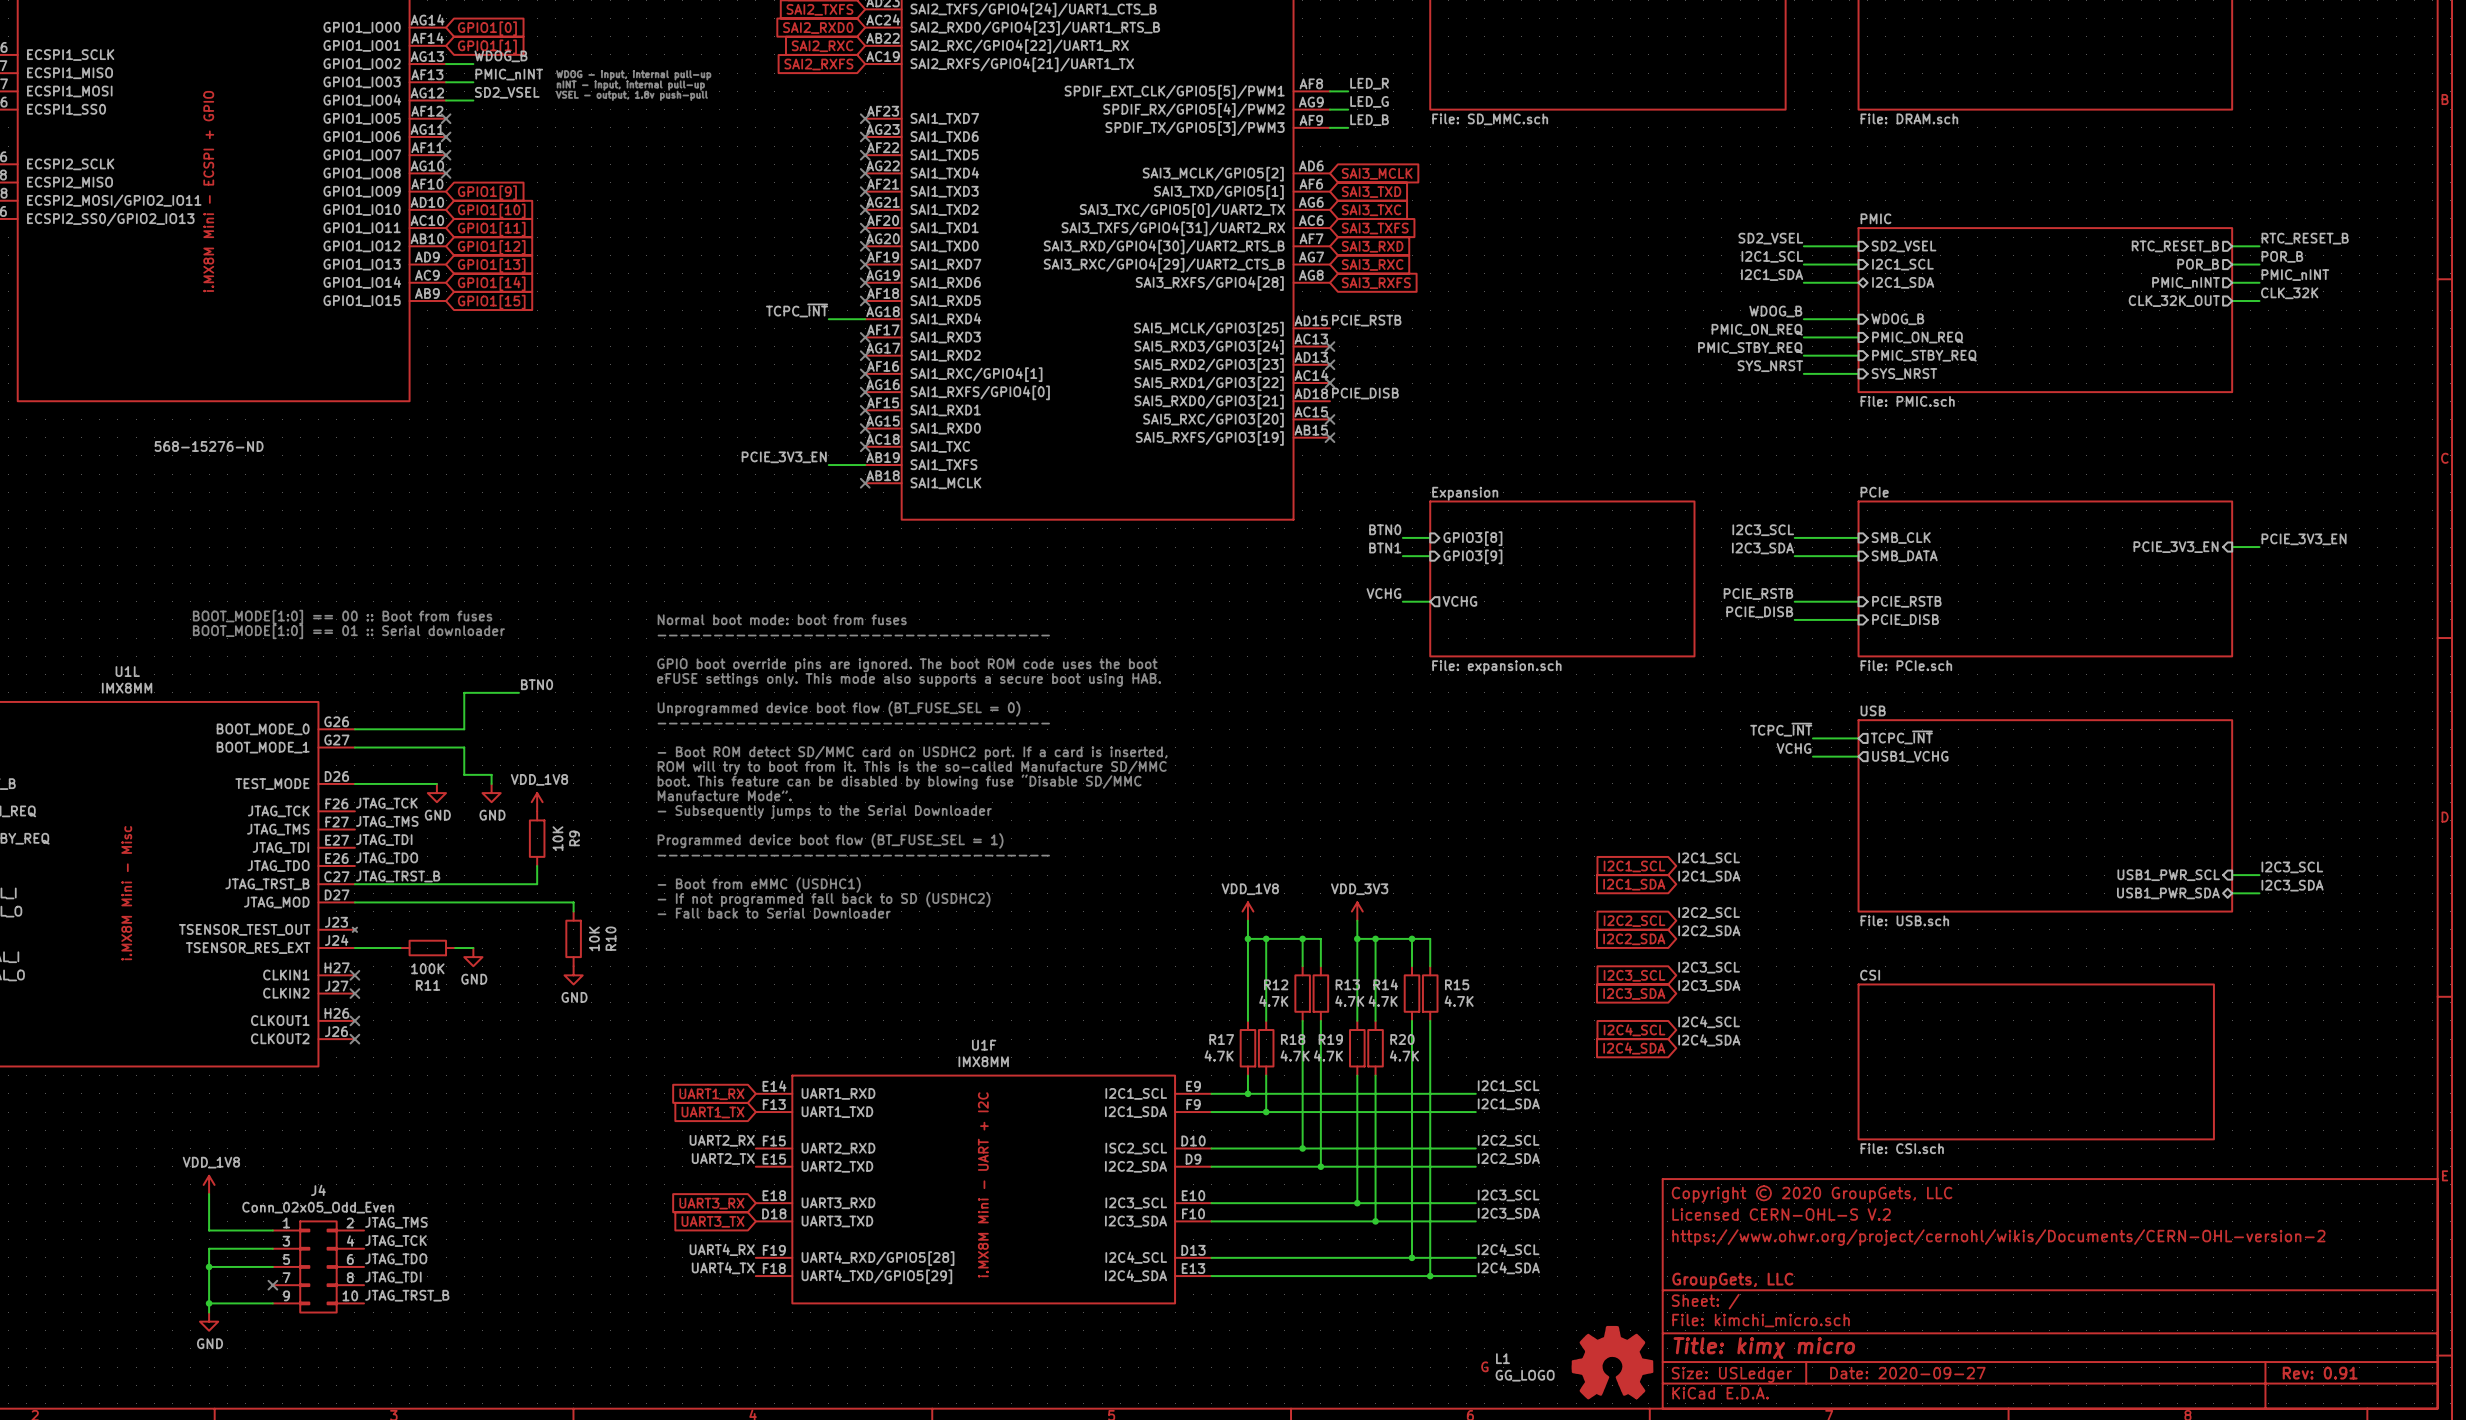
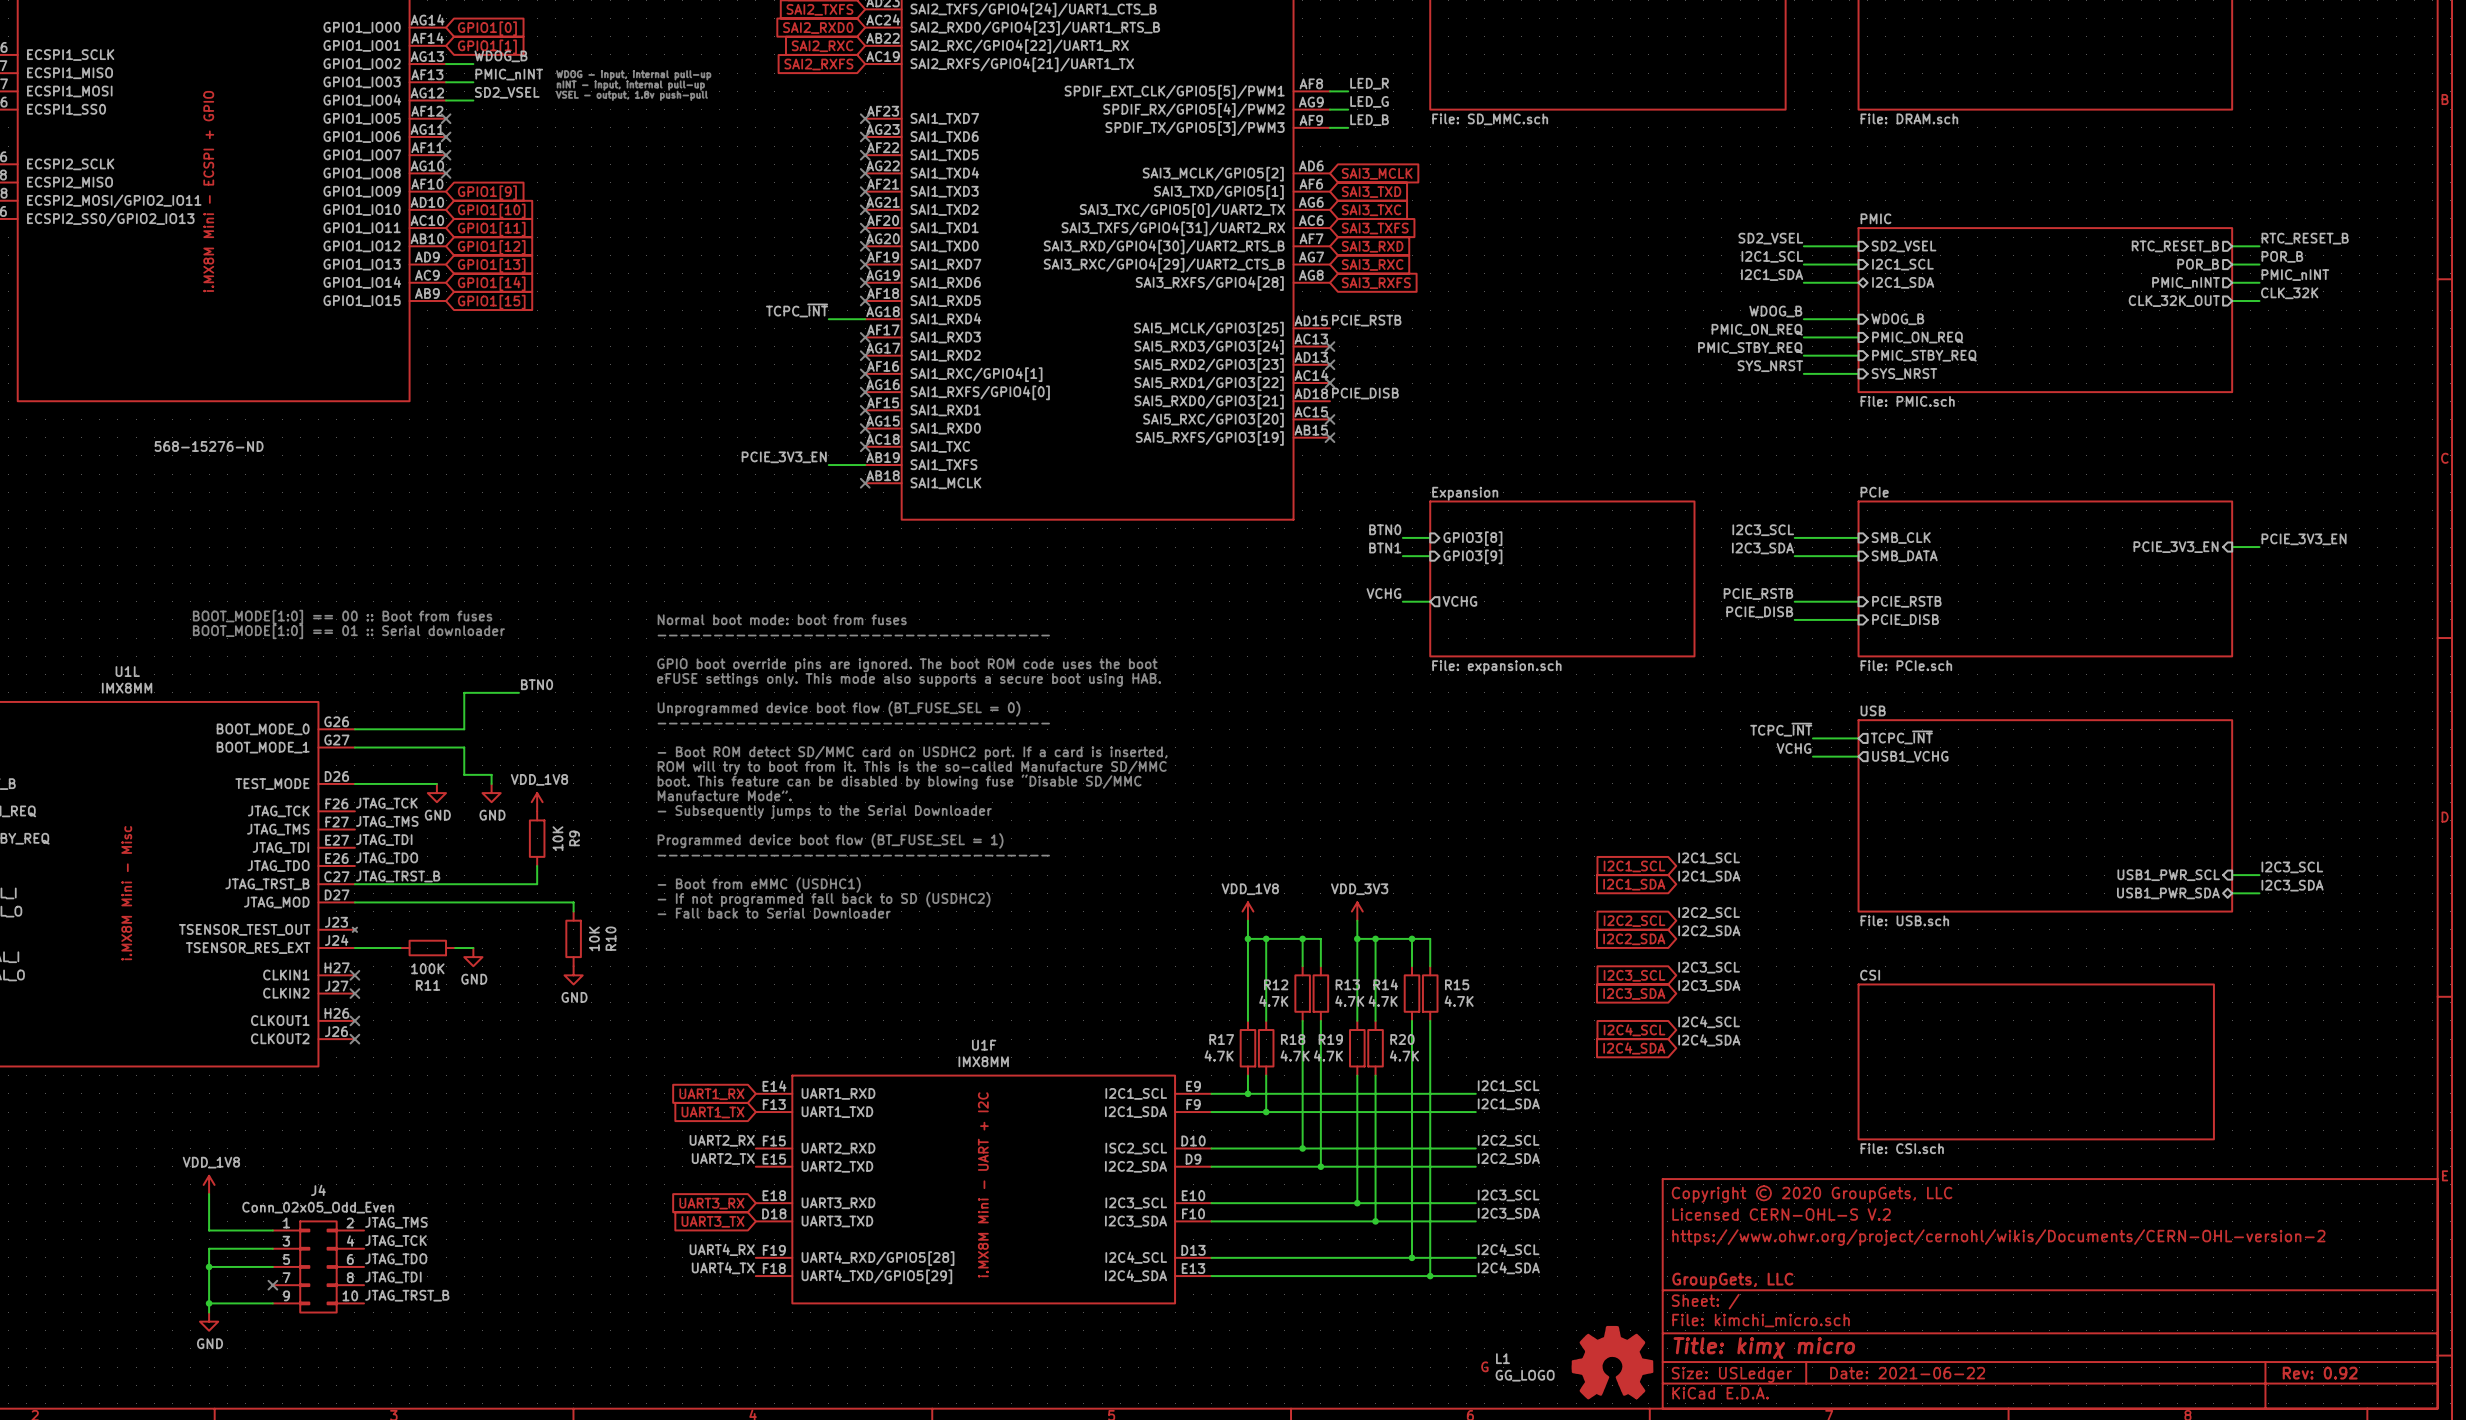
title block: Date: 2020-09-27 (1907, 1373) -> Date: 2021-06-22 (1907, 1373)
title block: Rev: 0.91 (2320, 1373) -> Rev: 0.92 (2320, 1373)

